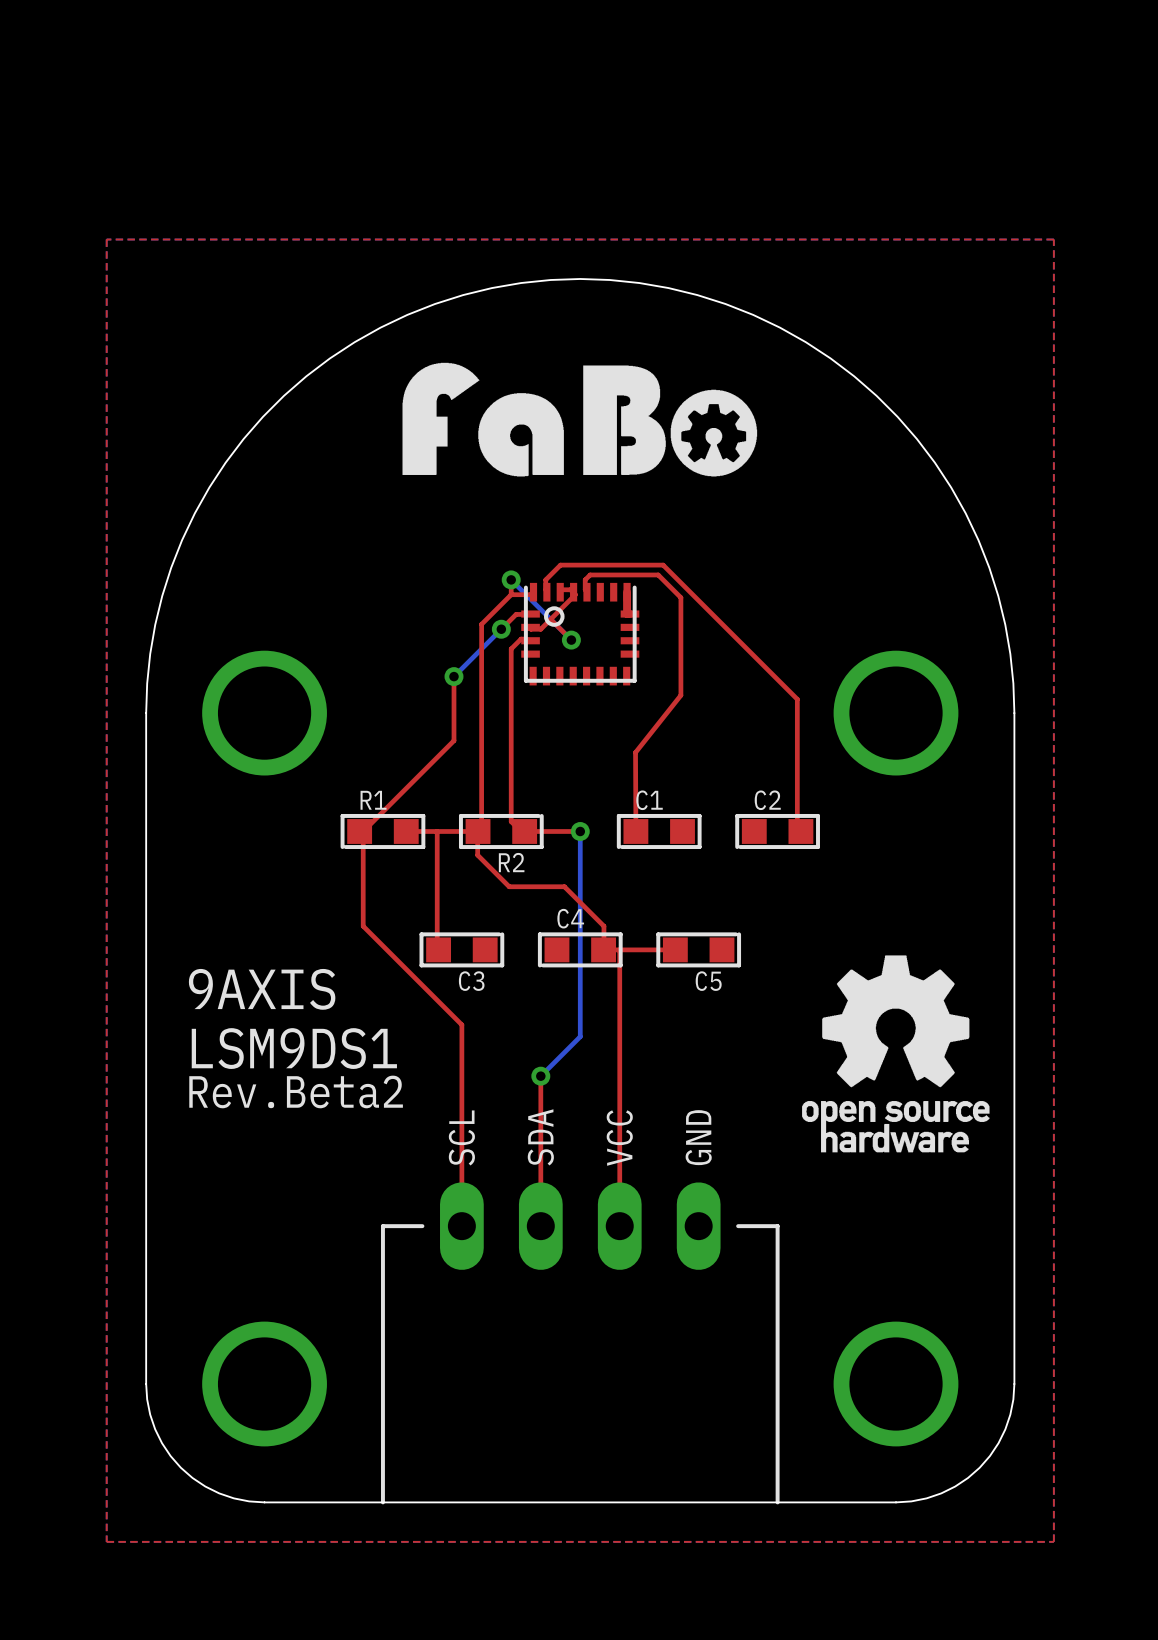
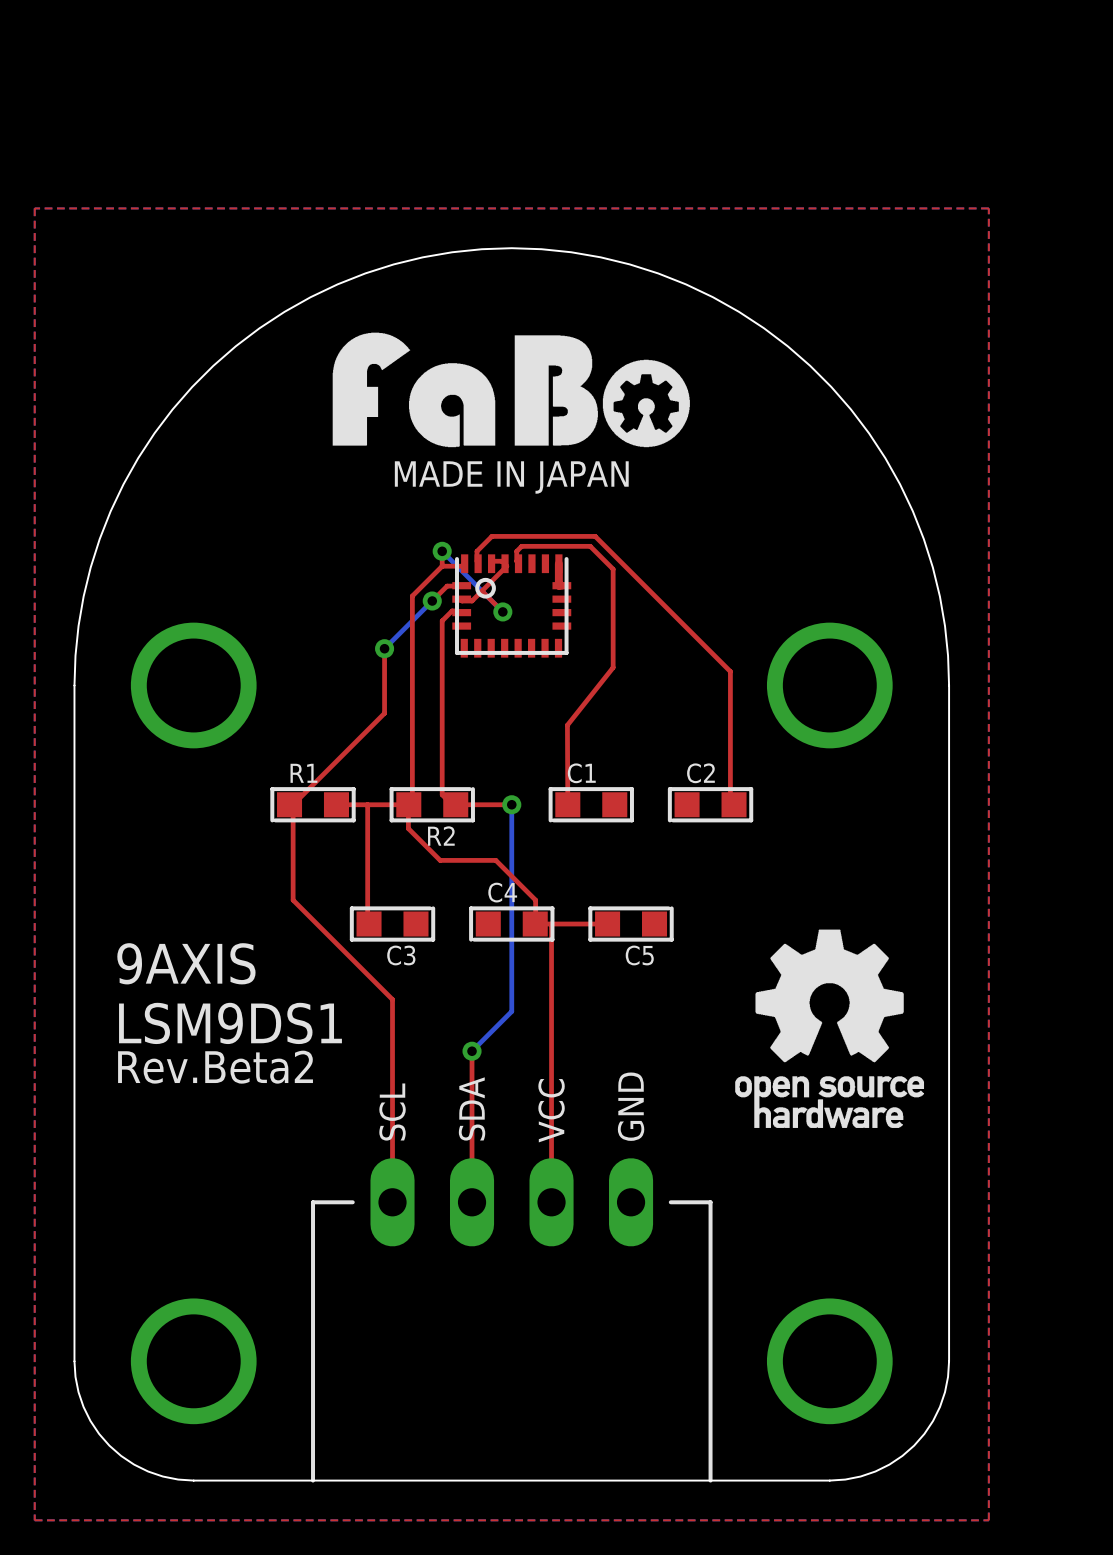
text: none -> MADE IN JAPAN (511, 477)

